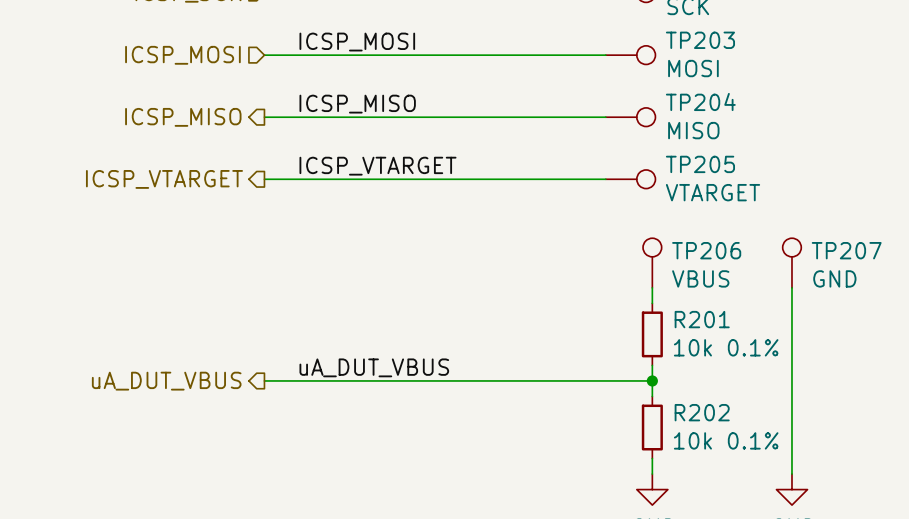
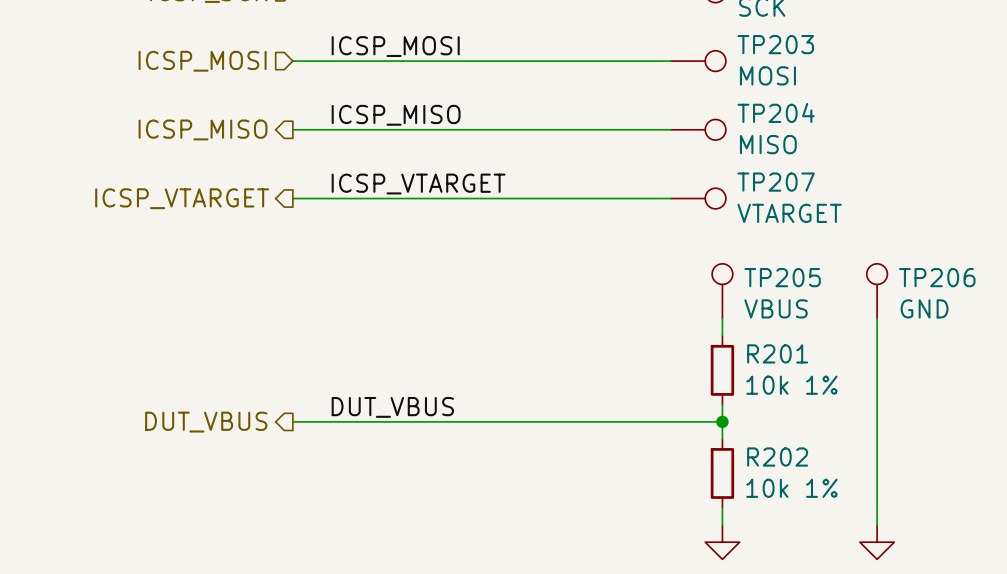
TP205 name: TP205 (700, 164) -> TP207 (776, 182)
TP206 name: TP206 (706, 250) -> TP205 (782, 277)
TP207 name: TP207 (846, 250) -> TP206 (937, 277)
R201 value: 10k 0.1% (726, 347) -> 10k 1% (791, 385)
label: uA_DUT_VBUS (374, 367) -> DUT_VBUS (392, 407)
hierarchical label: uA_DUT_VBUS (166, 381) -> DUT_VBUS (206, 422)
R202 value: 10k 0.1% (726, 440) -> 10k 1% (791, 488)

